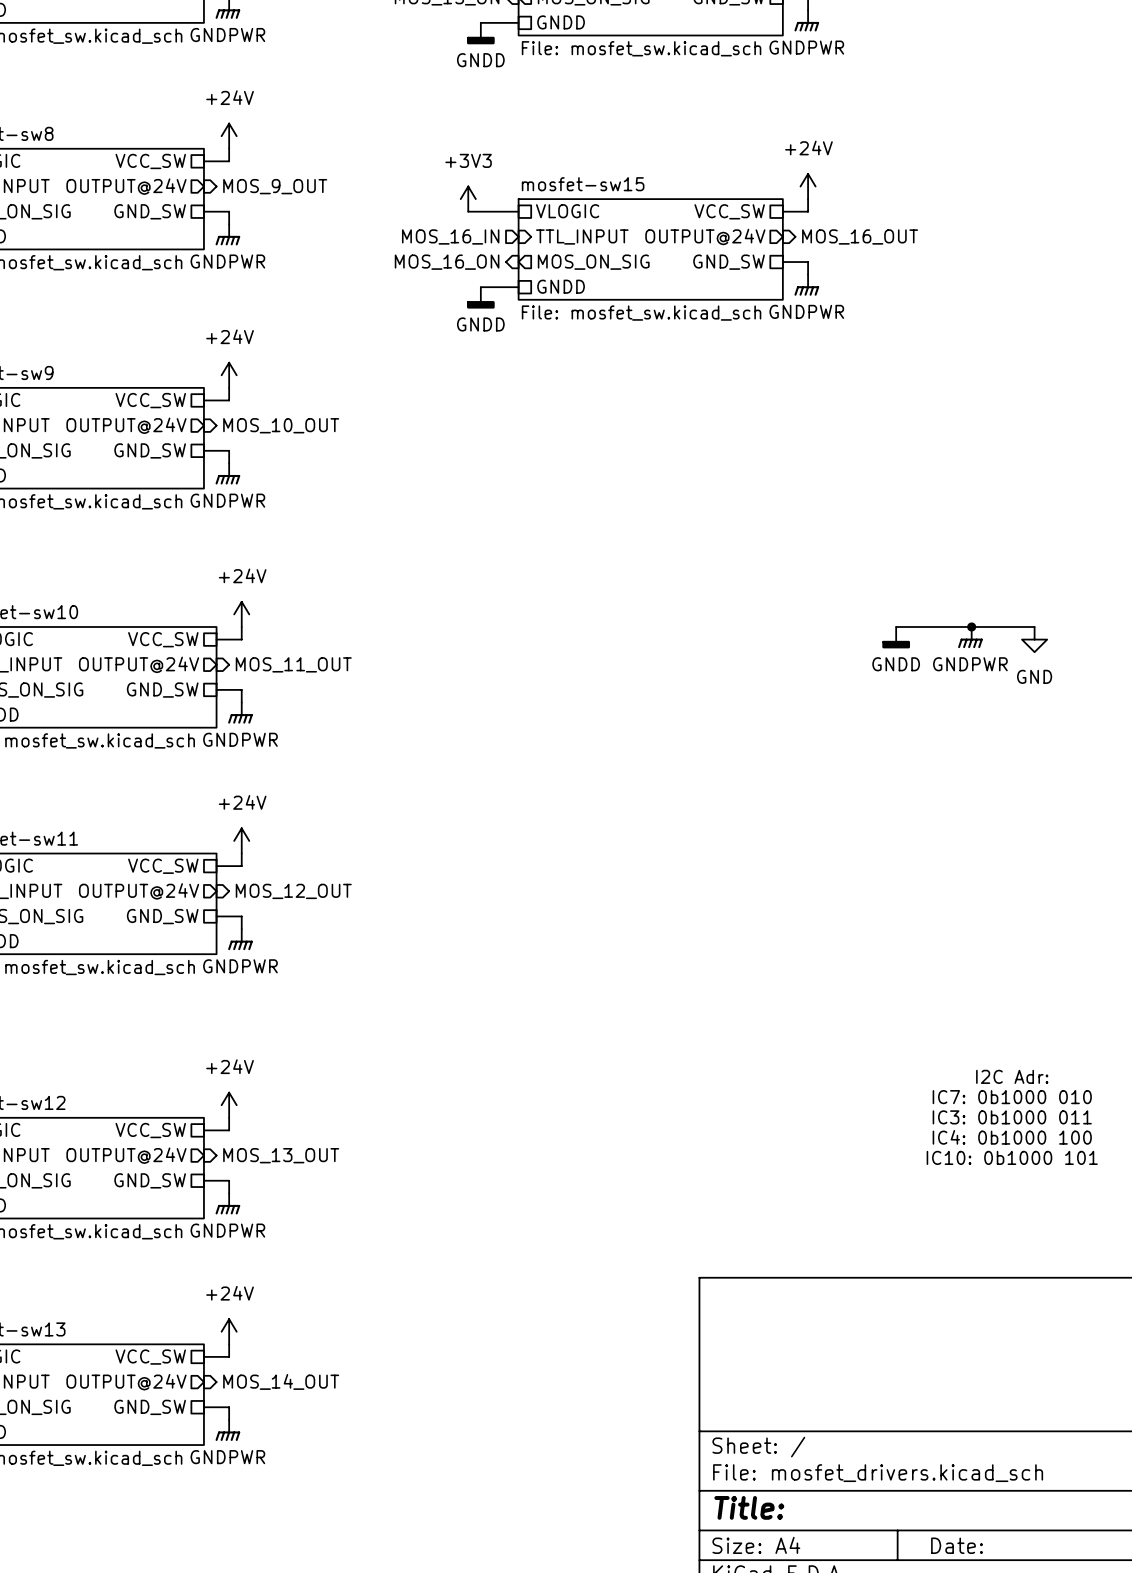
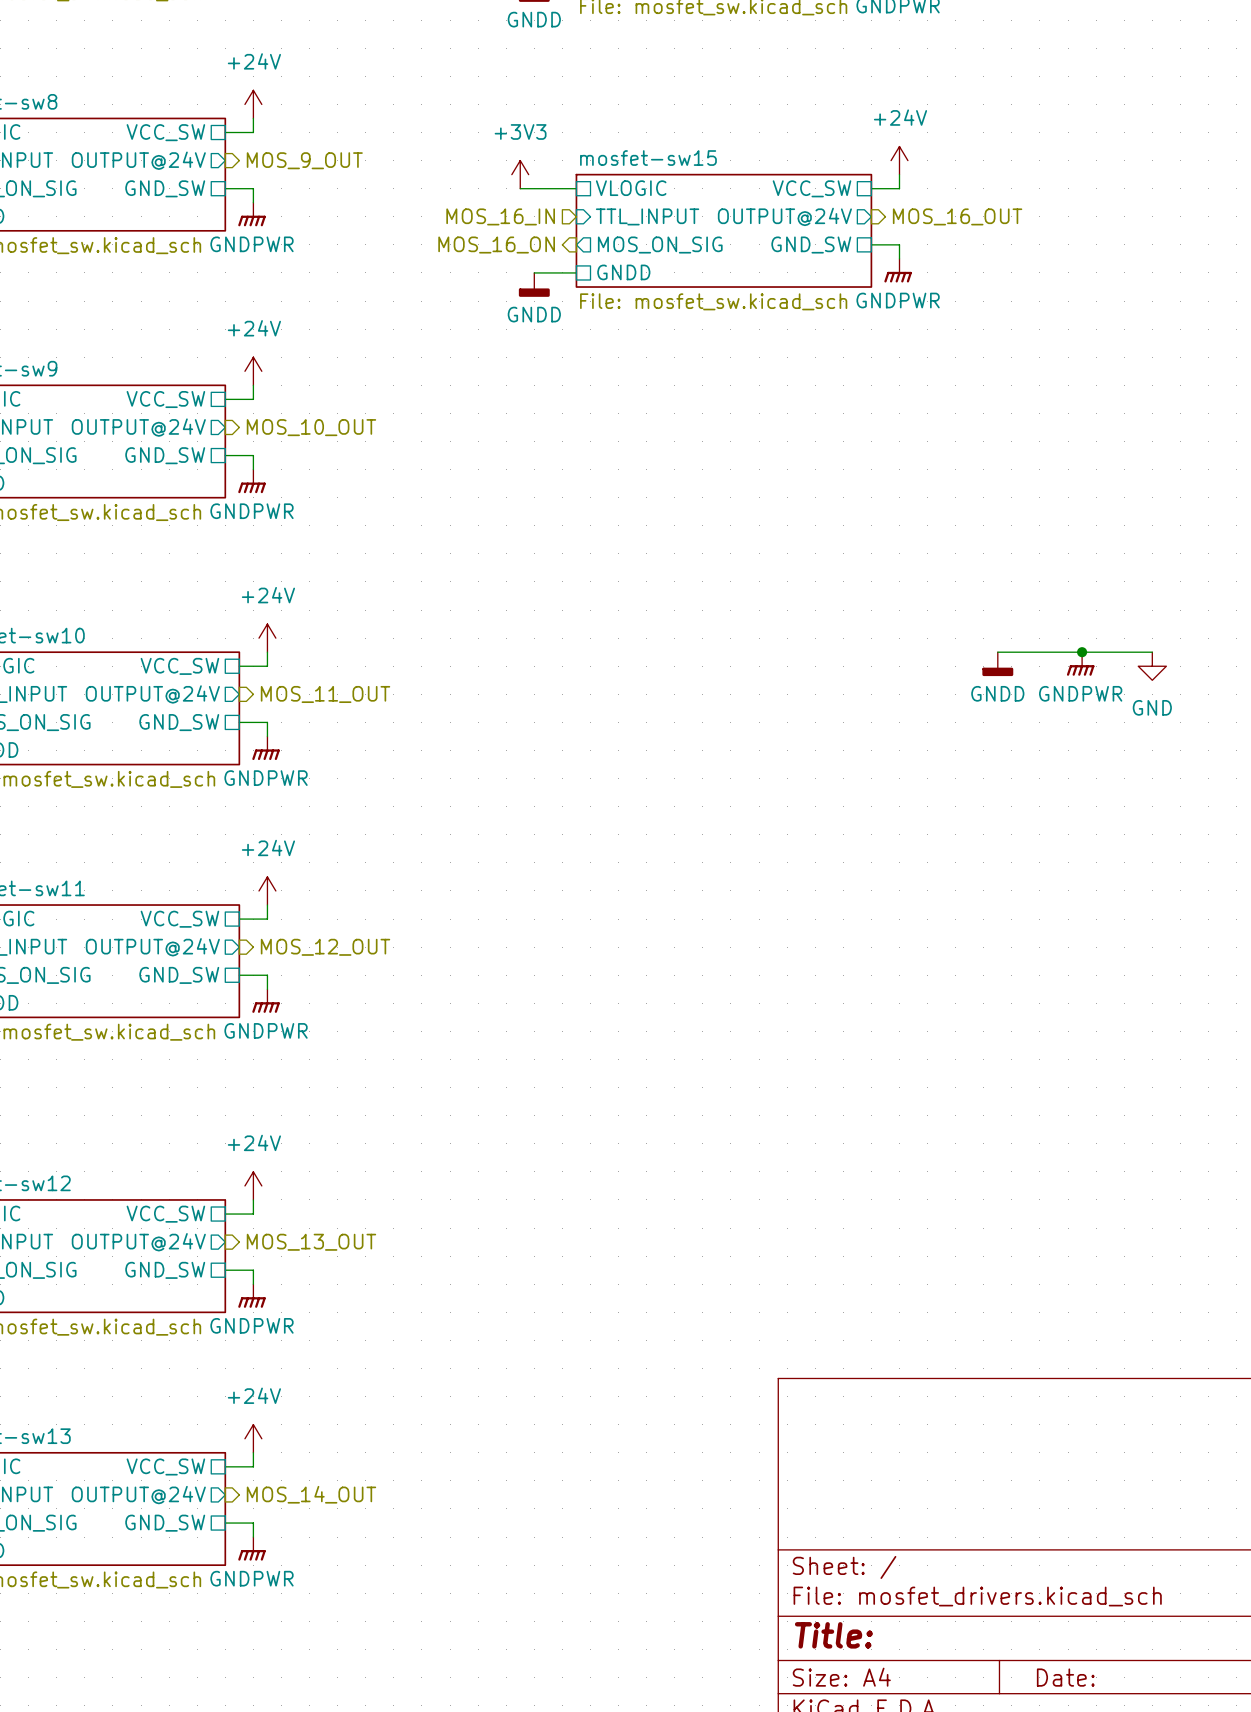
text: I2C Adr: (1012, 1076) -> none
text: IC7: 0b1000 010 (1012, 1097) -> none
text: IC3: 0b1000 011 (1012, 1117) -> none
text: IC4: 0b1000 100 (1012, 1137) -> none
text: IC10: 0b1000 101 (1012, 1157) -> none

